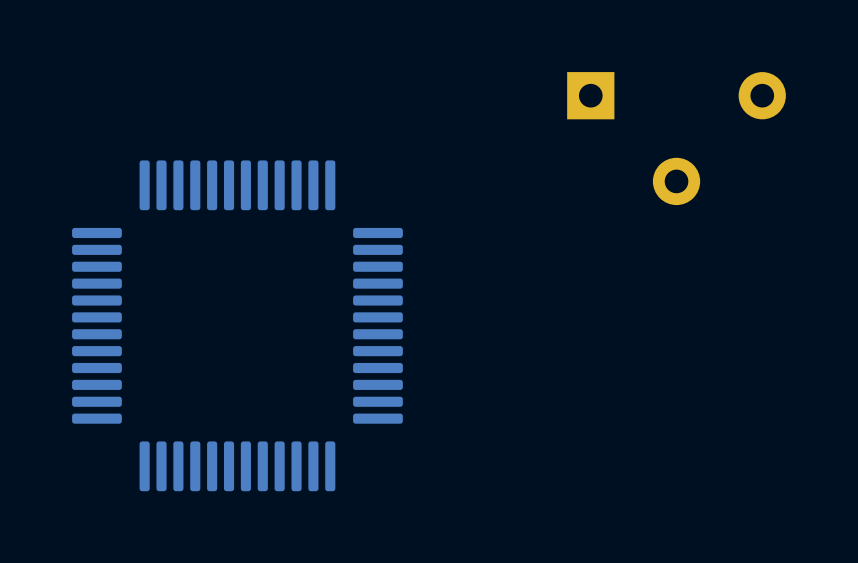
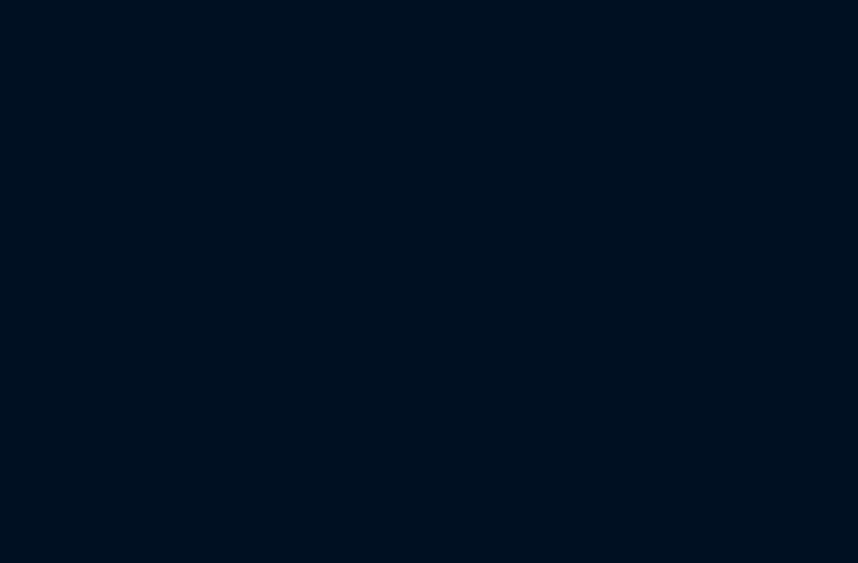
part: (676, 138) -> none
part: (237, 325) -> none

